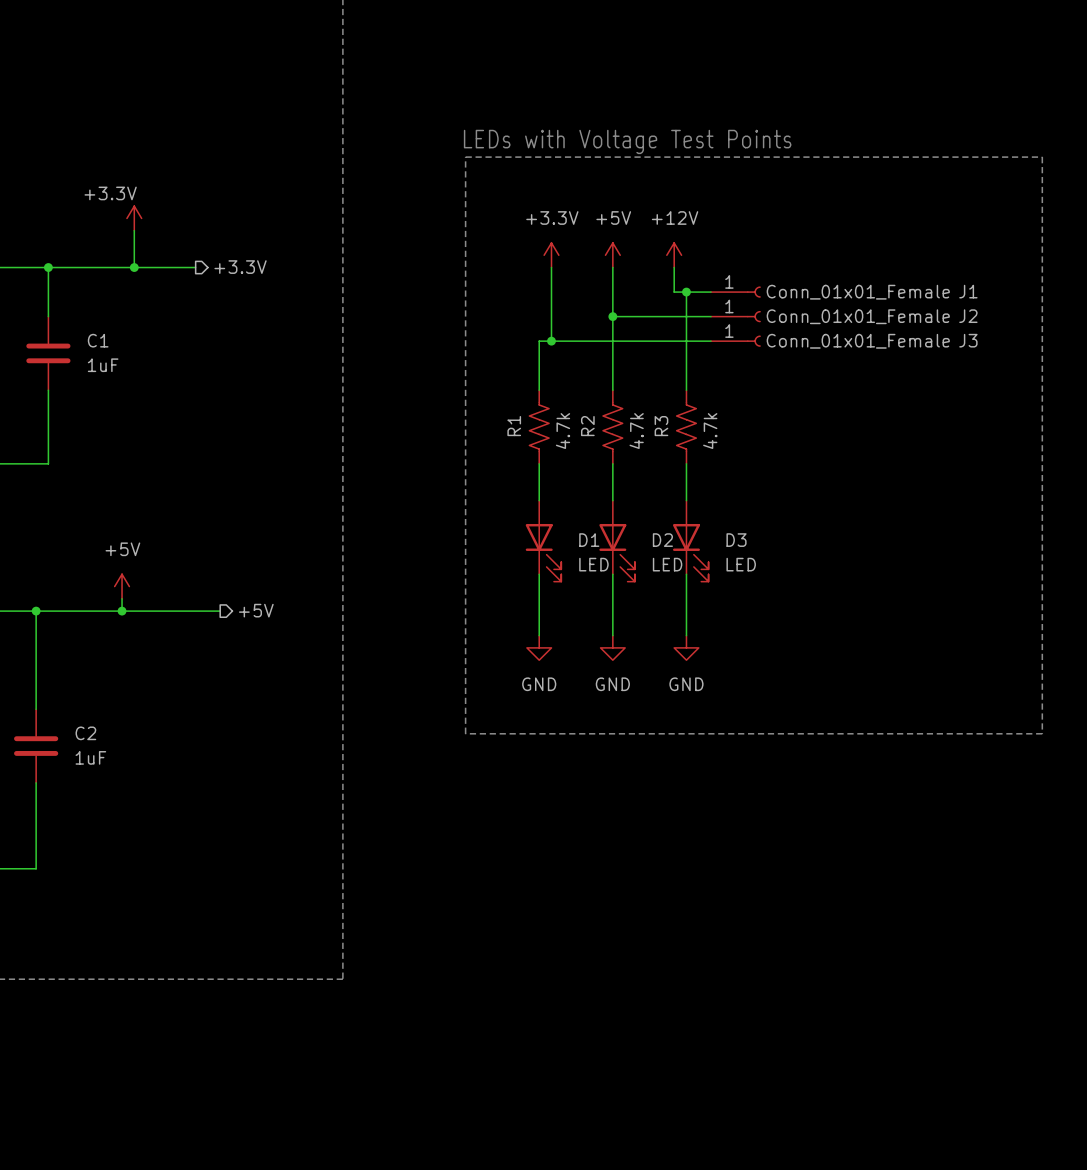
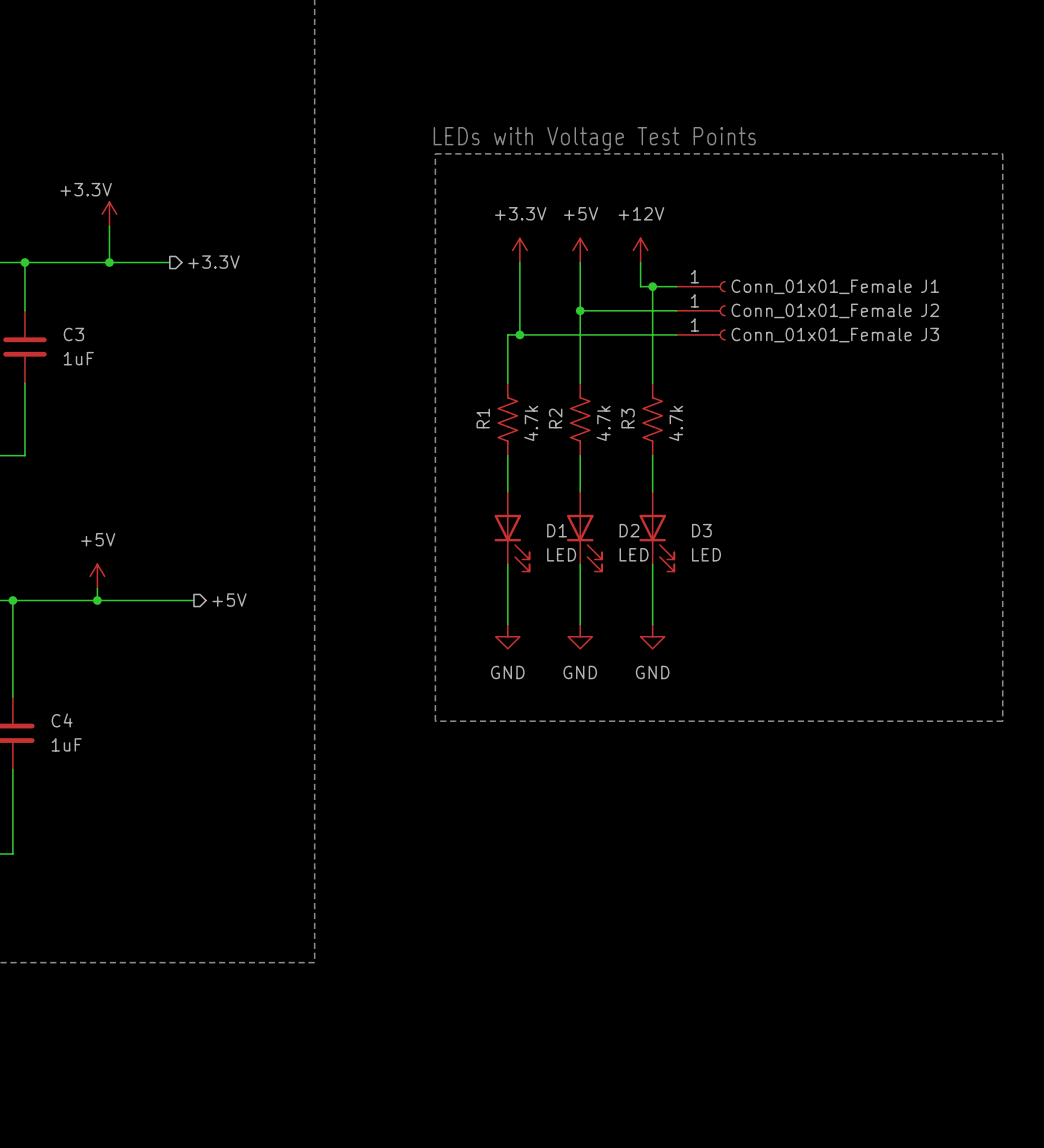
C1 name: C1 (98, 340) -> C3 (73, 334)
C2 name: C2 (85, 733) -> C4 (62, 720)

